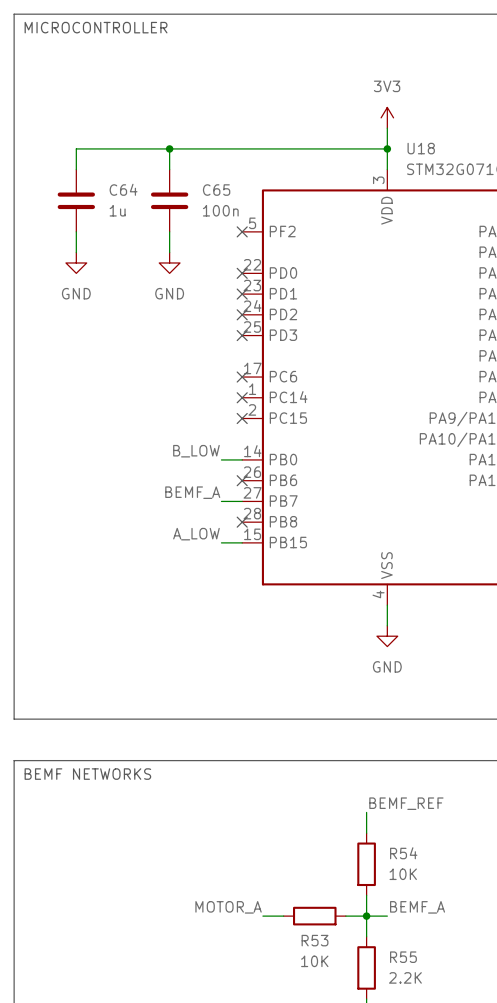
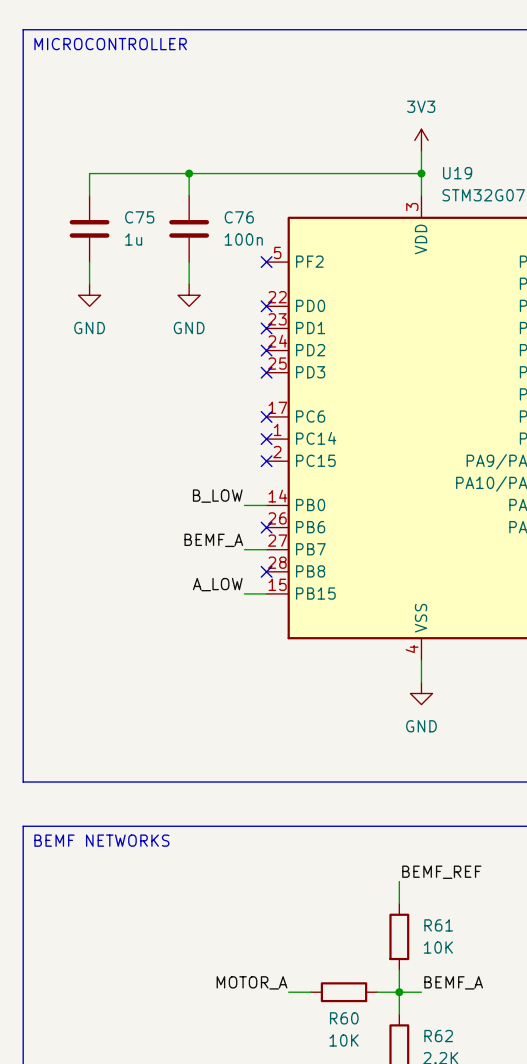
U18 name: U18 (421, 148) -> U19 (457, 173)
C64 name: C64 (123, 189) -> C75 (139, 217)
C65 name: C65 (216, 190) -> C76 (239, 217)
R54 name: R54 (403, 853) -> R61 (438, 925)
R53 name: R53 (315, 940) -> R60 (344, 1018)
R55 name: R55 (403, 957) -> R62 (438, 1036)

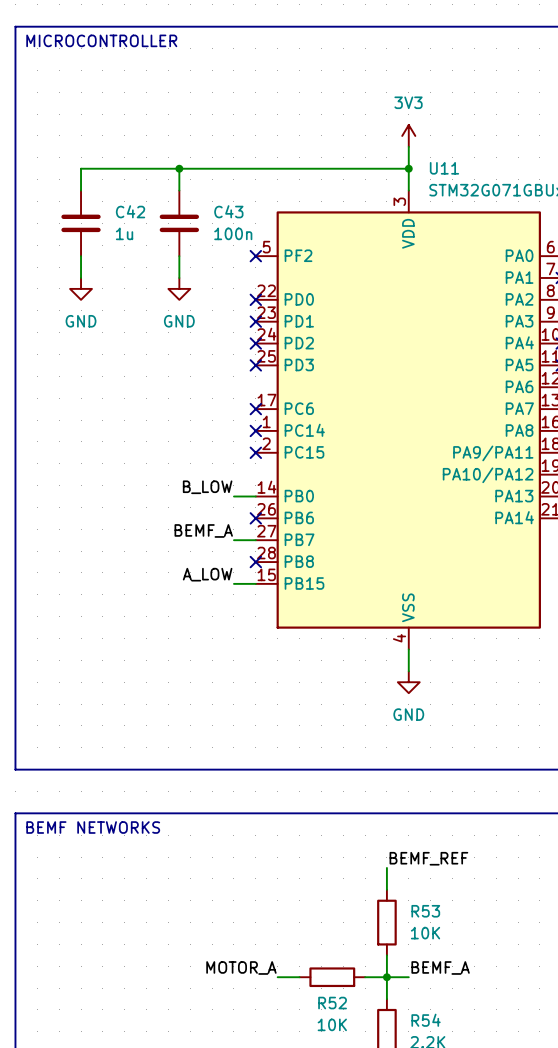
U19 name: U19 (457, 173) -> U11 (444, 168)
C75 name: C75 (139, 217) -> C42 (130, 211)
C76 name: C76 (239, 217) -> C43 (228, 211)
R61 name: R61 (438, 925) -> R53 (425, 911)
R60 name: R60 (344, 1018) -> R52 (332, 1003)
R62 name: R62 (438, 1036) -> R54 (426, 1020)

